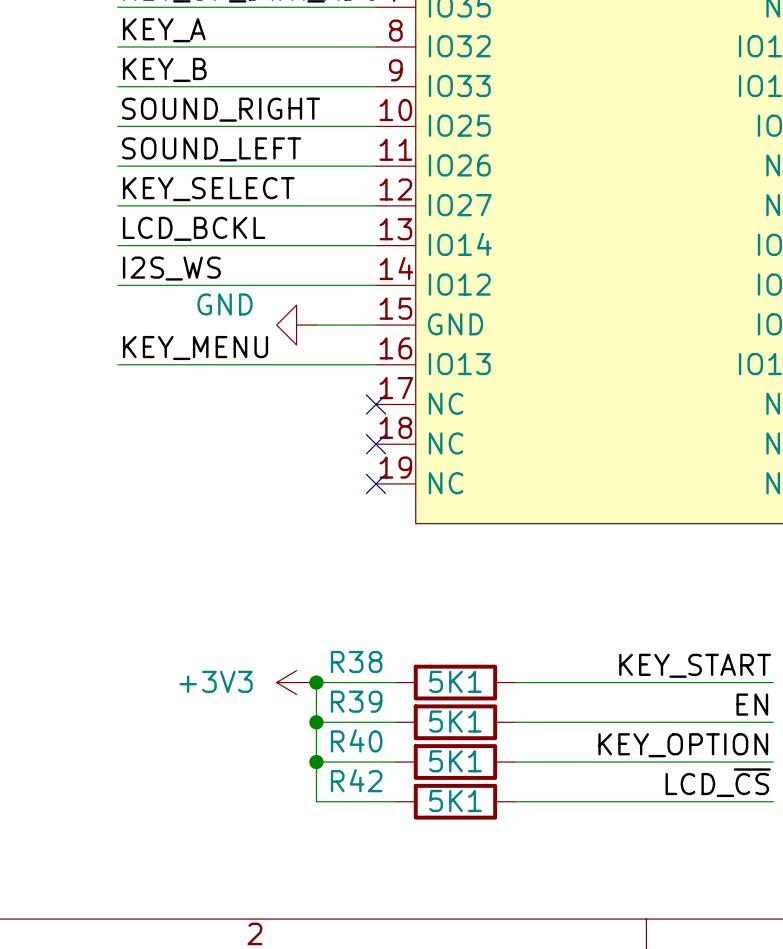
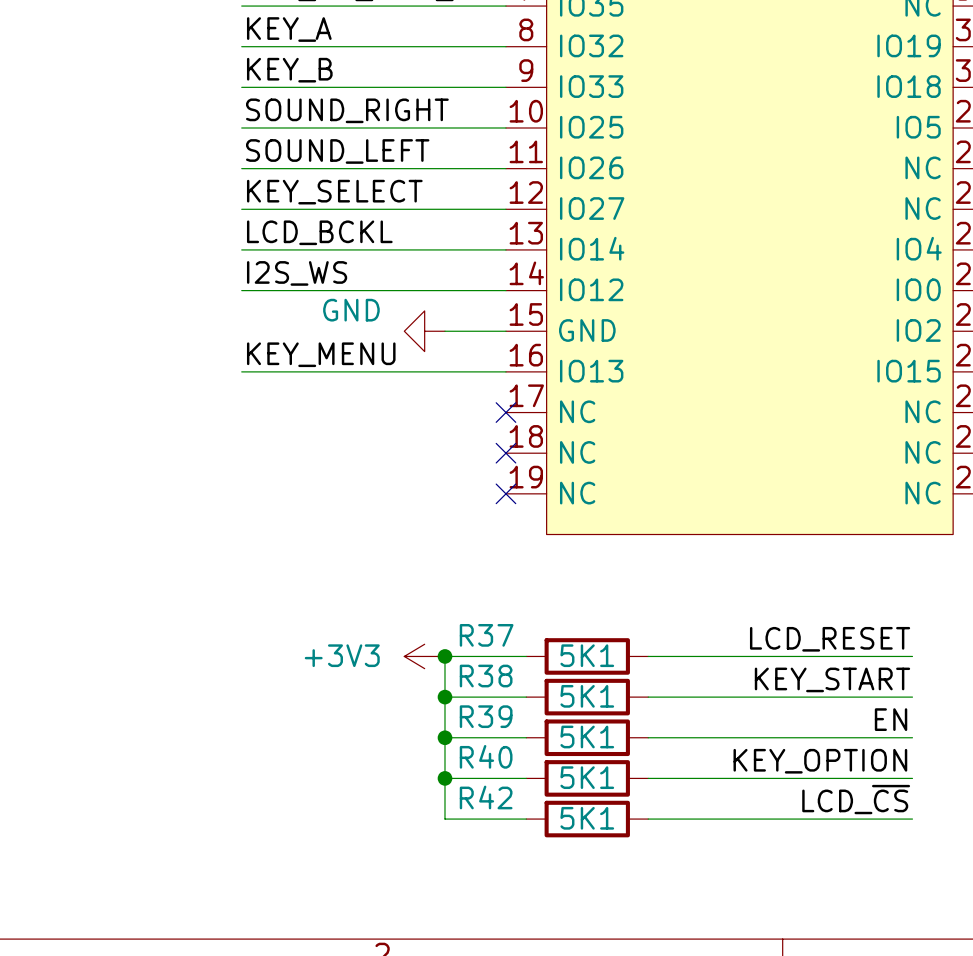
label: none -> LCD_RESET (830, 639)
junction: none -> (444, 656)
wire: none -> (526, 656) (444, 656) (444, 697)
R37: none -> 5K1 (587, 656)
wire: none -> (648, 656) (912, 656)
power symbol position: +3V3 (296, 682) -> +3V3 (424, 656)

